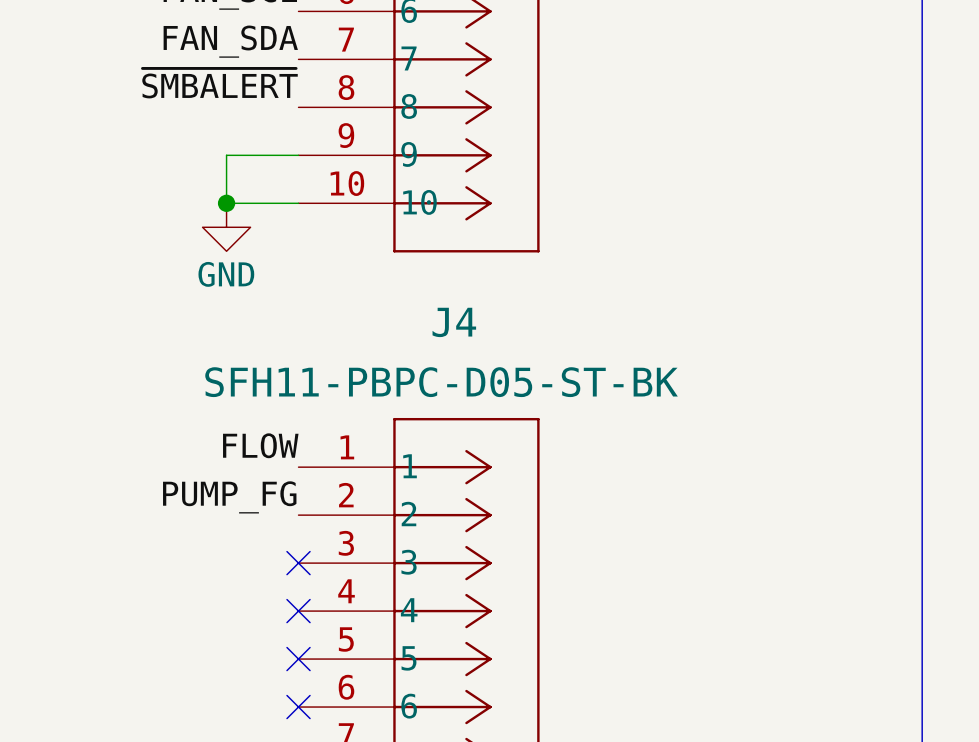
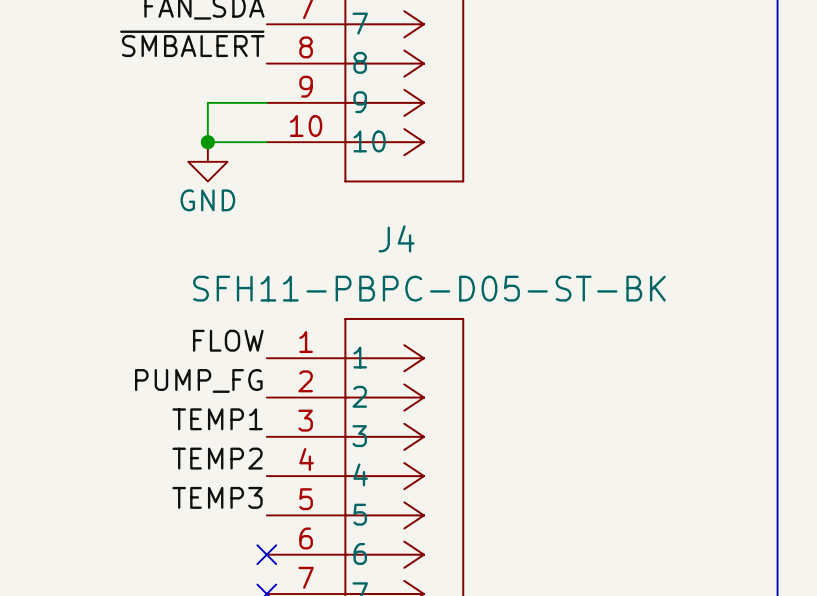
label: none -> TEMP1 (217, 419)
no-connect mark: (298, 563) -> none
label: none -> TEMP2 (217, 458)
no-connect mark: (298, 611) -> none
label: none -> TEMP3 (217, 497)
no-connect mark: (298, 659) -> none

